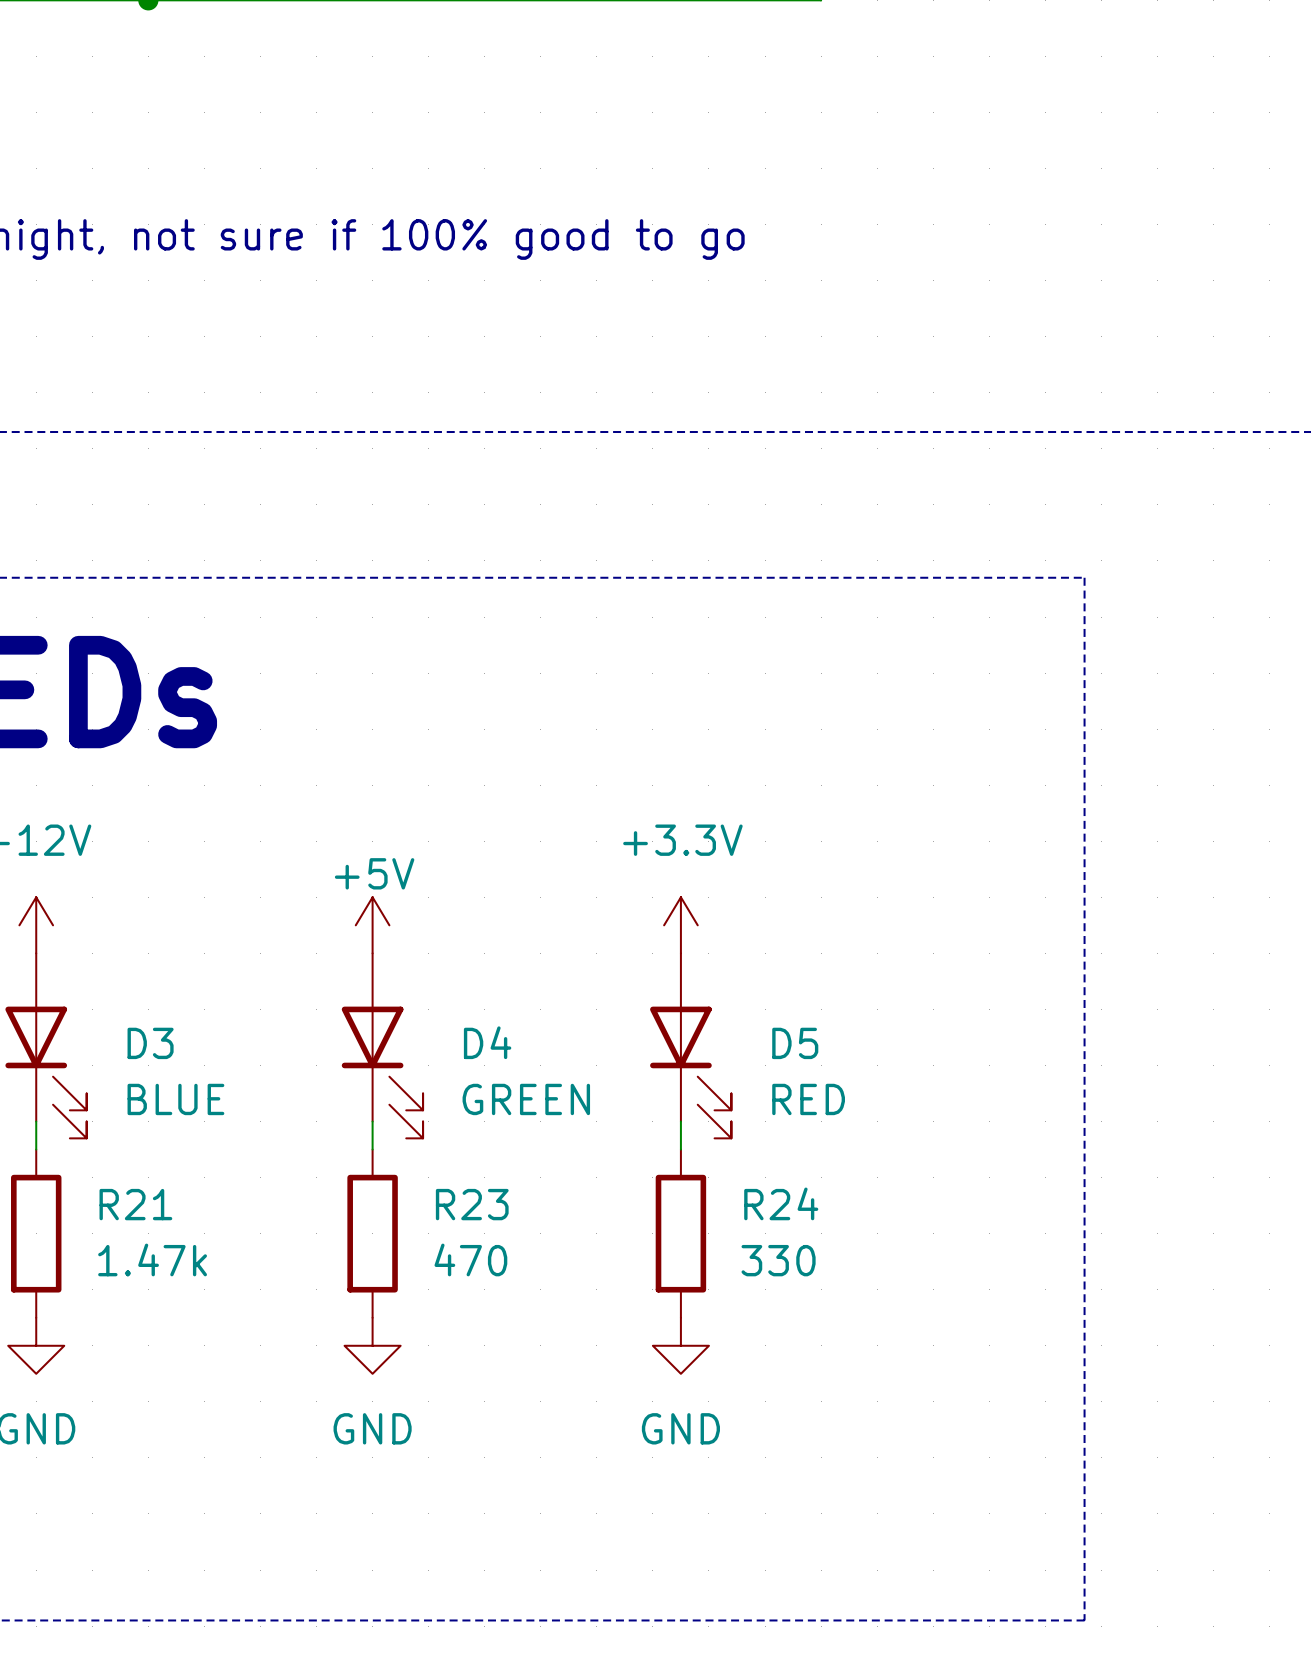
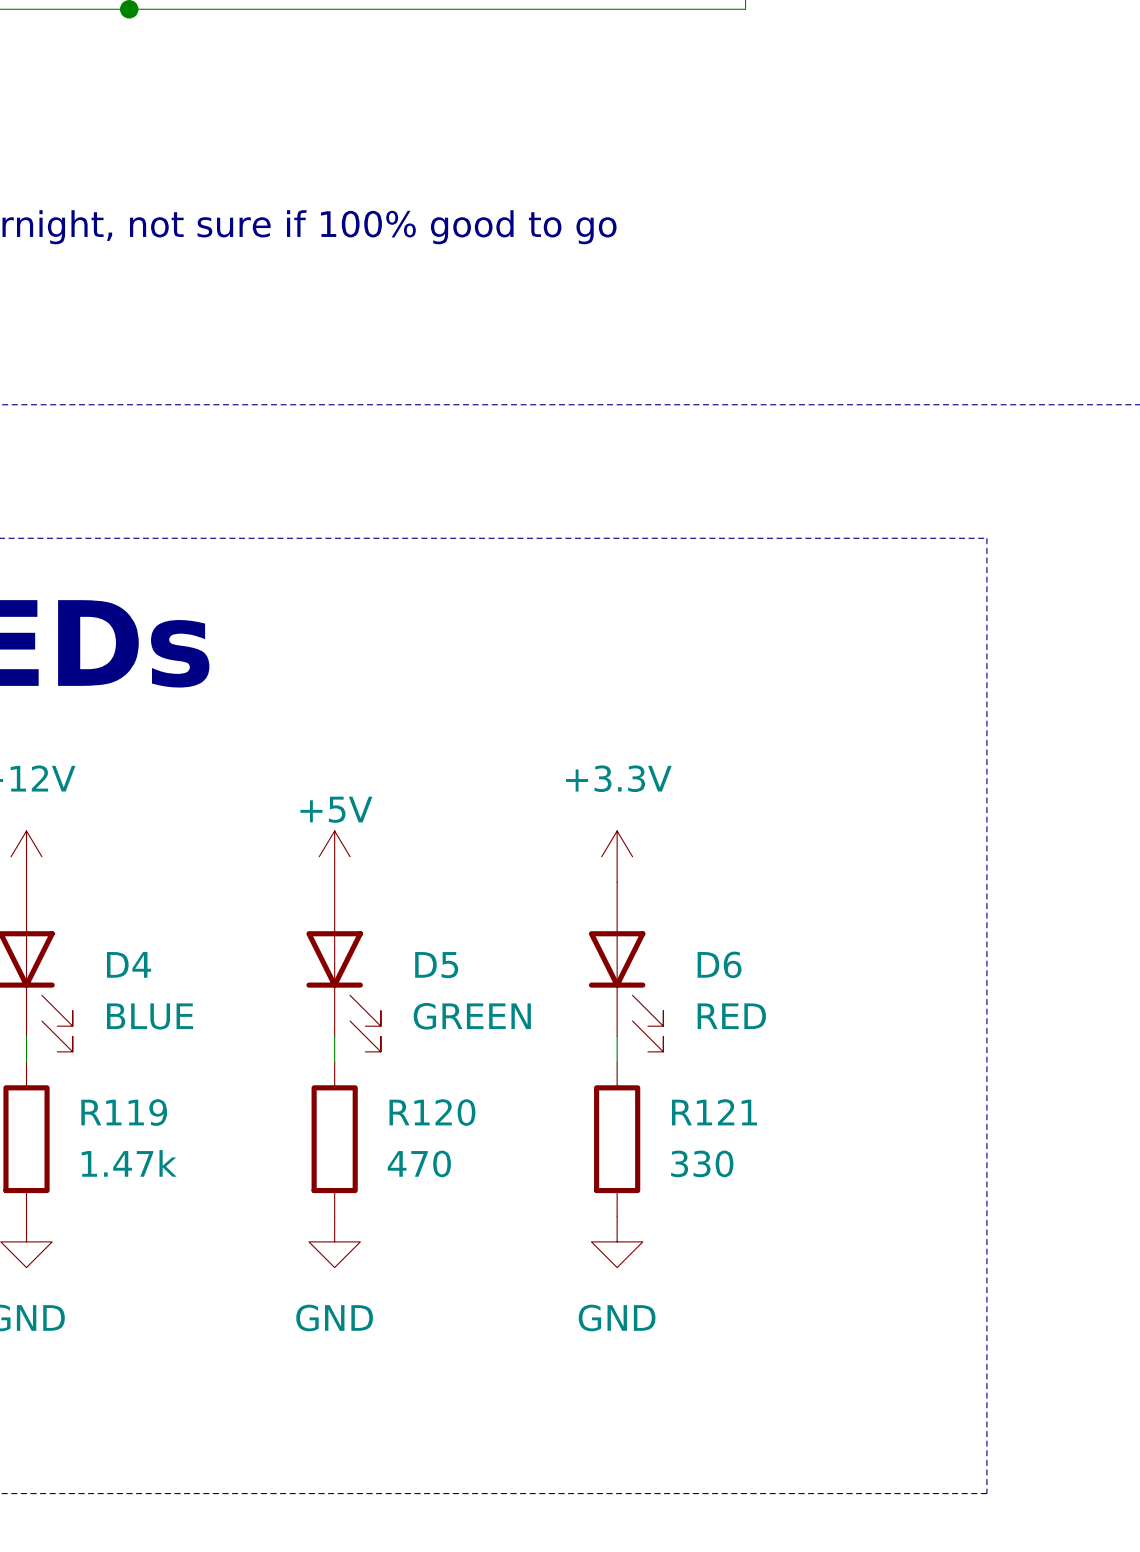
D4 name: D4 (487, 1042) -> D5 (436, 965)
D3 name: D3 (150, 1043) -> D4 (129, 964)
D5 name: D5 (795, 1043) -> D6 (719, 964)
R24 name: R24 (781, 1203) -> R121 (714, 1112)
R21 name: R21 (135, 1204) -> R119 (124, 1112)
R23 name: R23 (472, 1204) -> R120 (432, 1112)

